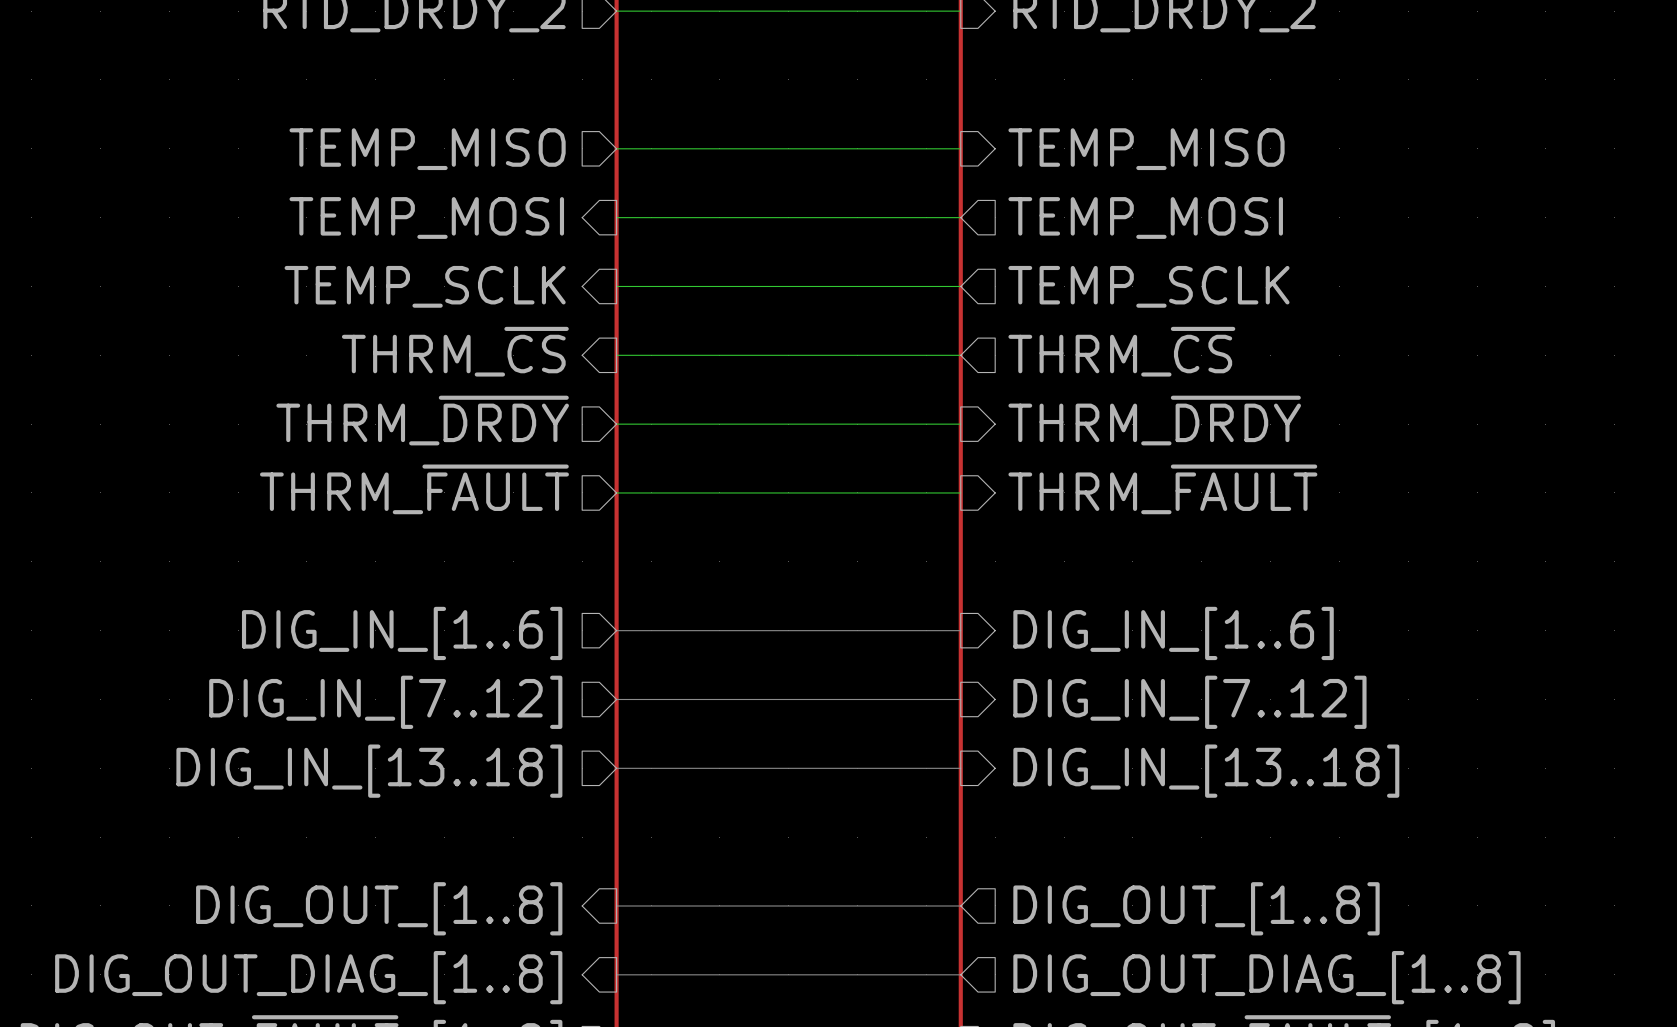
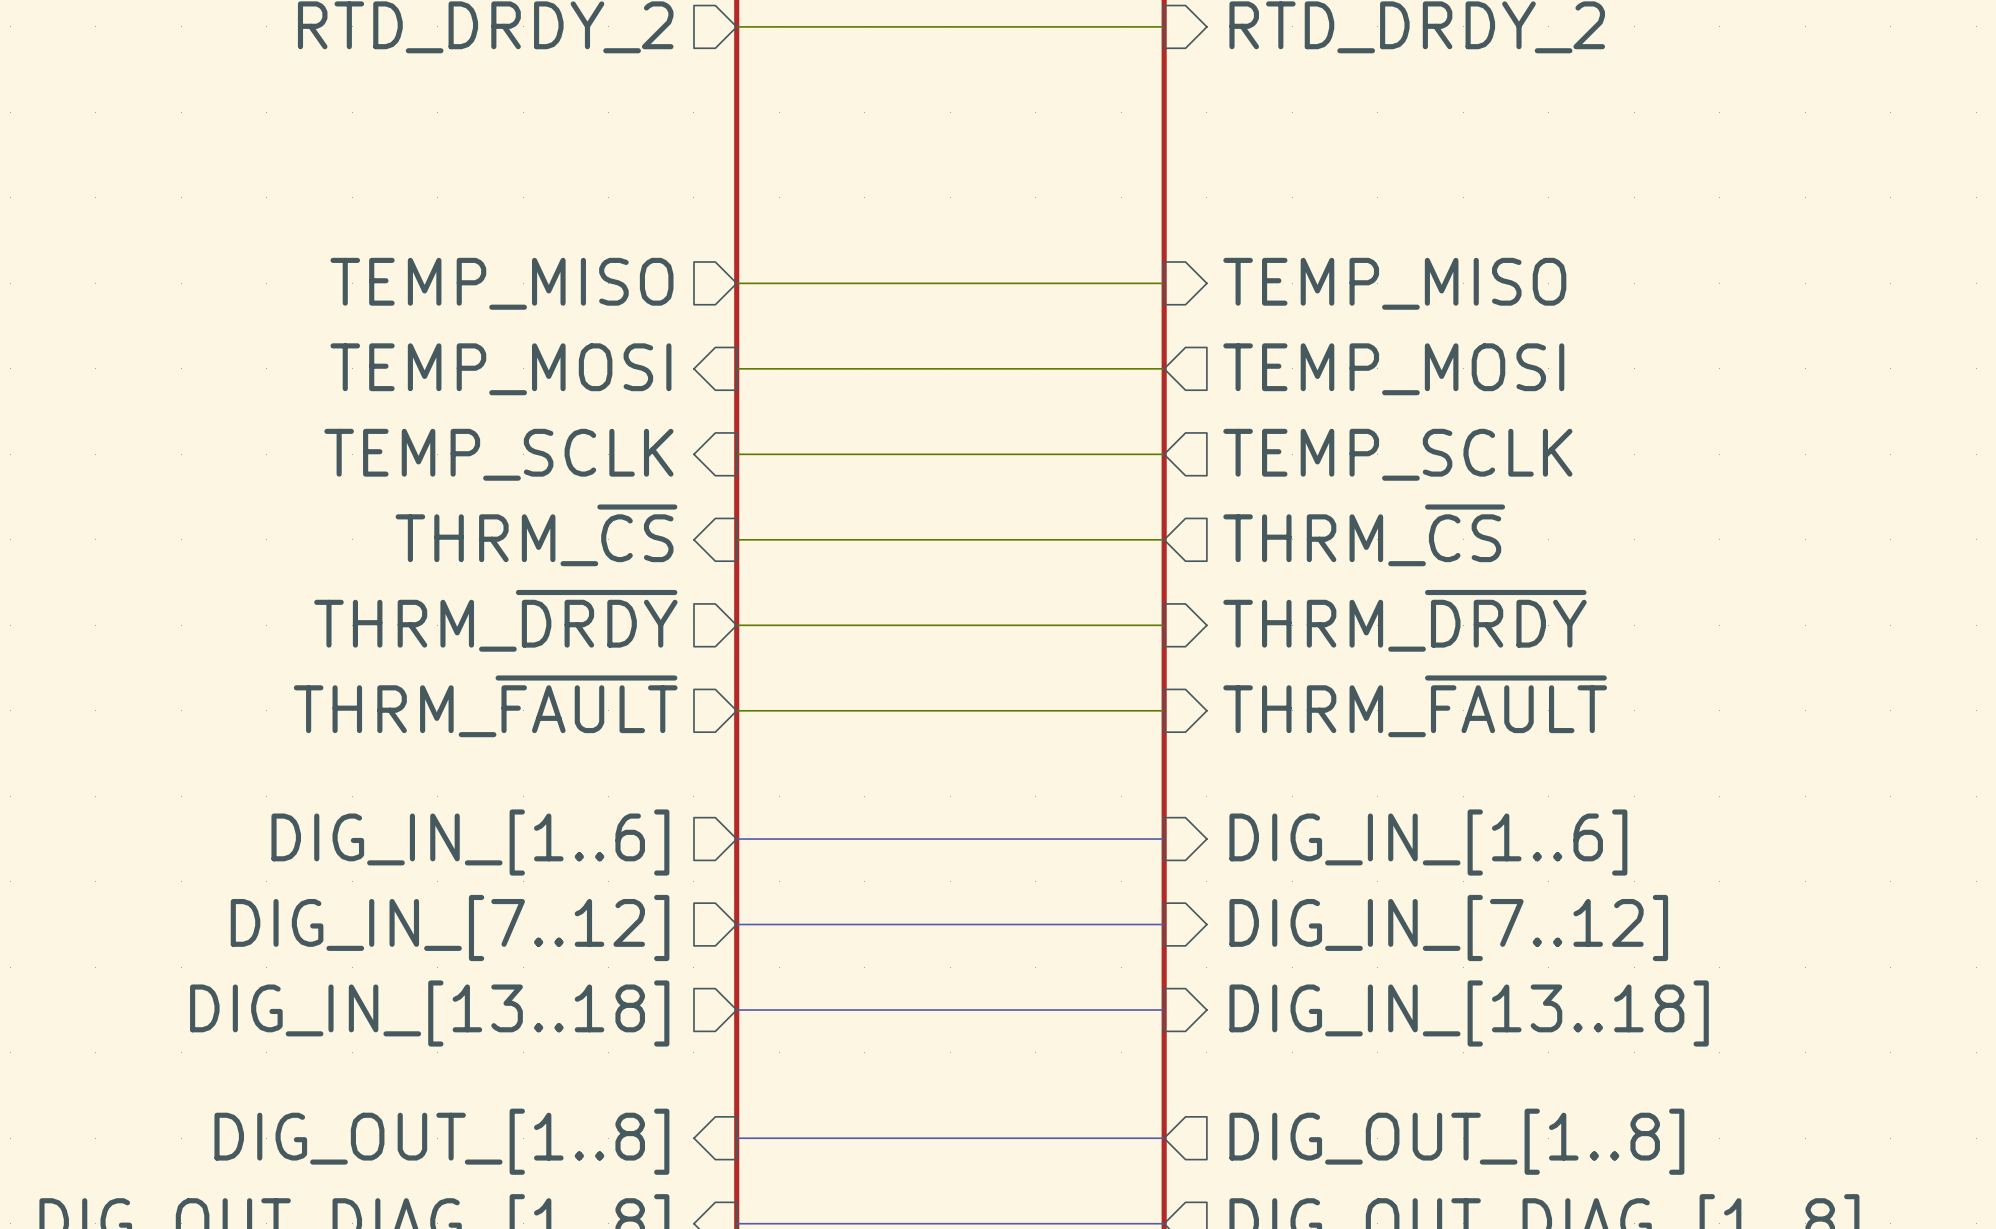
wire: (616, 148) (960, 148) -> (736, 710) (1164, 710)
sheet pin: TEMP_MISO (427, 149) -> none
sheet pin: TEMP_MISO (1146, 149) -> none
sheet pin shape: input (426, 217) -> output (501, 283)
sheet pin: TEMP_MOSI (426, 217) -> TEMP_MISO (501, 283)
sheet pin shape: output (1145, 217) -> input (1394, 283)
sheet pin: TEMP_MOSI (1145, 217) -> TEMP_MISO (1394, 283)
sheet pin: TEMP_SCLK (425, 286) -> TEMP_MOSI (500, 369)
sheet pin: TEMP_SCLK (1148, 286) -> TEMP_MOSI (1393, 369)
sheet pin: THRM_~{CS} (455, 351) -> TEMP_SCLK (498, 454)
sheet pin: THRM_~{CS} (1121, 351) -> TEMP_SCLK (1397, 454)
sheet pin shape: output (422, 420) -> input (536, 535)
sheet pin: THRM_~{DRDY} (422, 420) -> THRM_~{CS} (536, 535)
sheet pin shape: input (1154, 420) -> output (1364, 535)
sheet pin: THRM_~{DRDY} (1154, 420) -> THRM_~{CS} (1364, 535)
sheet pin: THRM_~{FAULT} (414, 489) -> THRM_~{DRDY} (495, 620)
sheet pin: THRM_~{FAULT} (1162, 489) -> THRM_~{DRDY} (1405, 620)
sheet pin: none -> THRM_~{FAULT} (485, 706)
sheet pin: none -> THRM_~{FAULT} (1415, 706)
bus: (616, 630) (960, 630) -> (736, 839) (1164, 839)
sheet pin position: DIG_IN_[1..6] (402, 633) -> DIG_IN_[1..6] (470, 842)
sheet pin position: DIG_IN_[1..6] (1173, 633) -> DIG_IN_[1..6] (1428, 842)
bus: (616, 699) (960, 699) -> (736, 924) (1164, 924)
sheet pin position: DIG_IN_[7..12] (385, 702) -> DIG_IN_[7..12] (450, 928)
sheet pin position: DIG_IN_[7..12] (1189, 702) -> DIG_IN_[7..12] (1448, 928)
bus: (616, 768) (960, 768) -> (736, 1010) (1164, 1010)
sheet pin position: DIG_IN_[13..18] (369, 771) -> DIG_IN_[13..18] (429, 1013)
sheet pin position: DIG_IN_[13..18] (1206, 771) -> DIG_IN_[13..18] (1469, 1013)

